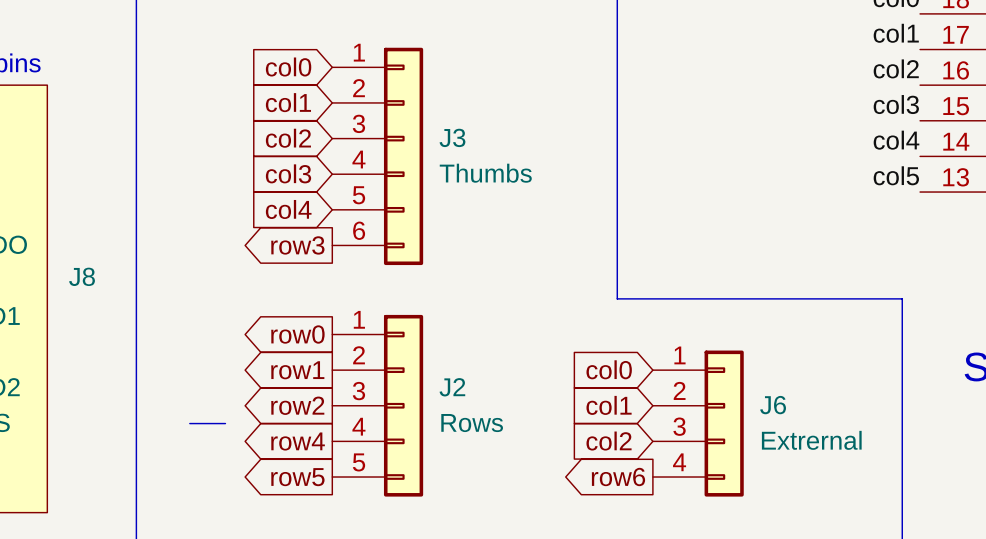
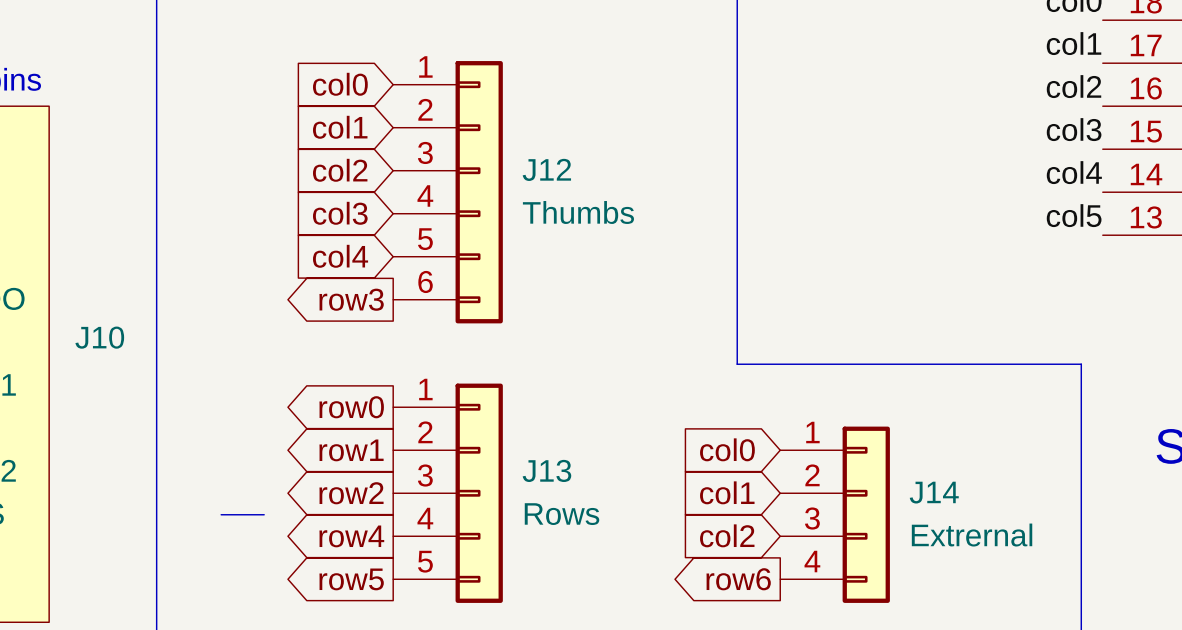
J3 name: J3 (452, 137) -> J12 (546, 169)
J8 name: J8 (82, 276) -> J10 (99, 337)
J2 name: J2 (452, 387) -> J13 (546, 470)
J6 name: J6 (773, 405) -> J14 (934, 492)

